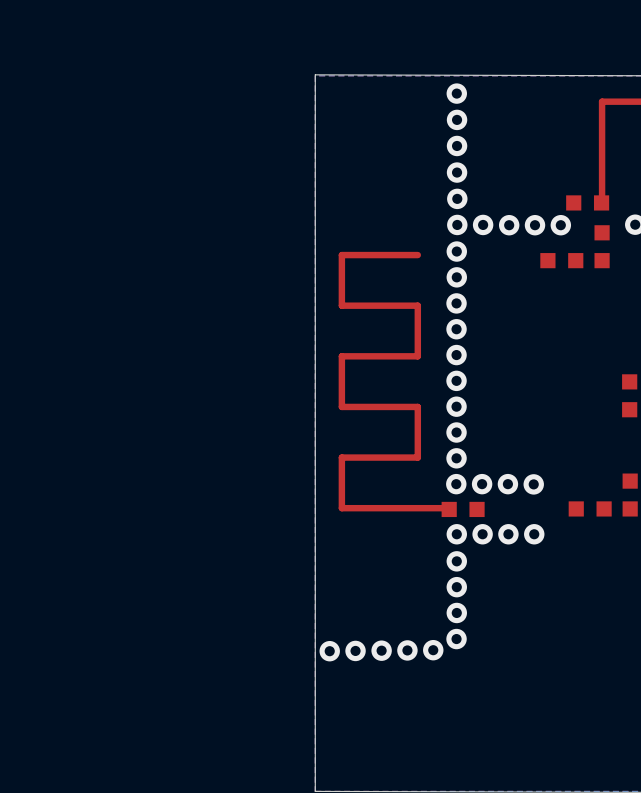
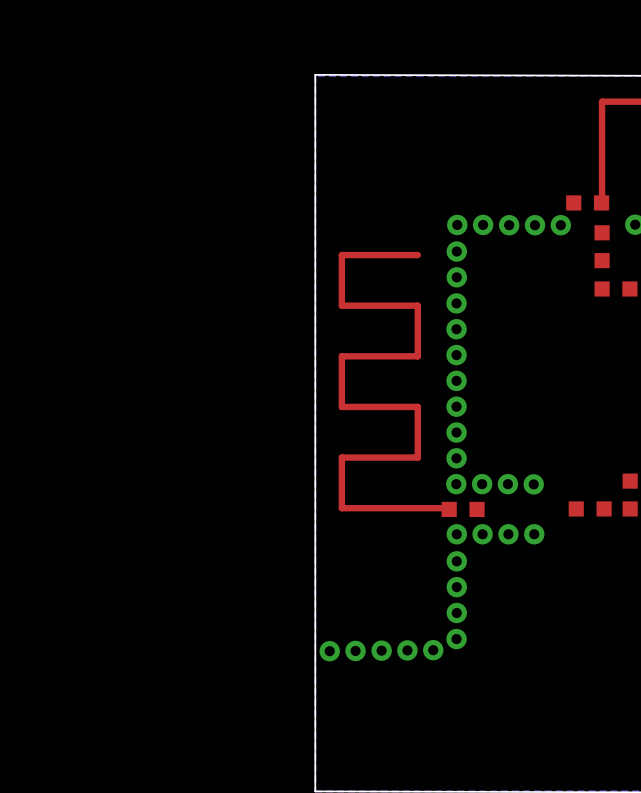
via: (456, 93) -> none
via: (457, 119) -> none
via: (457, 145) -> none
via: (457, 172) -> none
via: (457, 198) -> none
part: (561, 260) -> none
part: none -> (616, 288)
part: (629, 395) -> none

